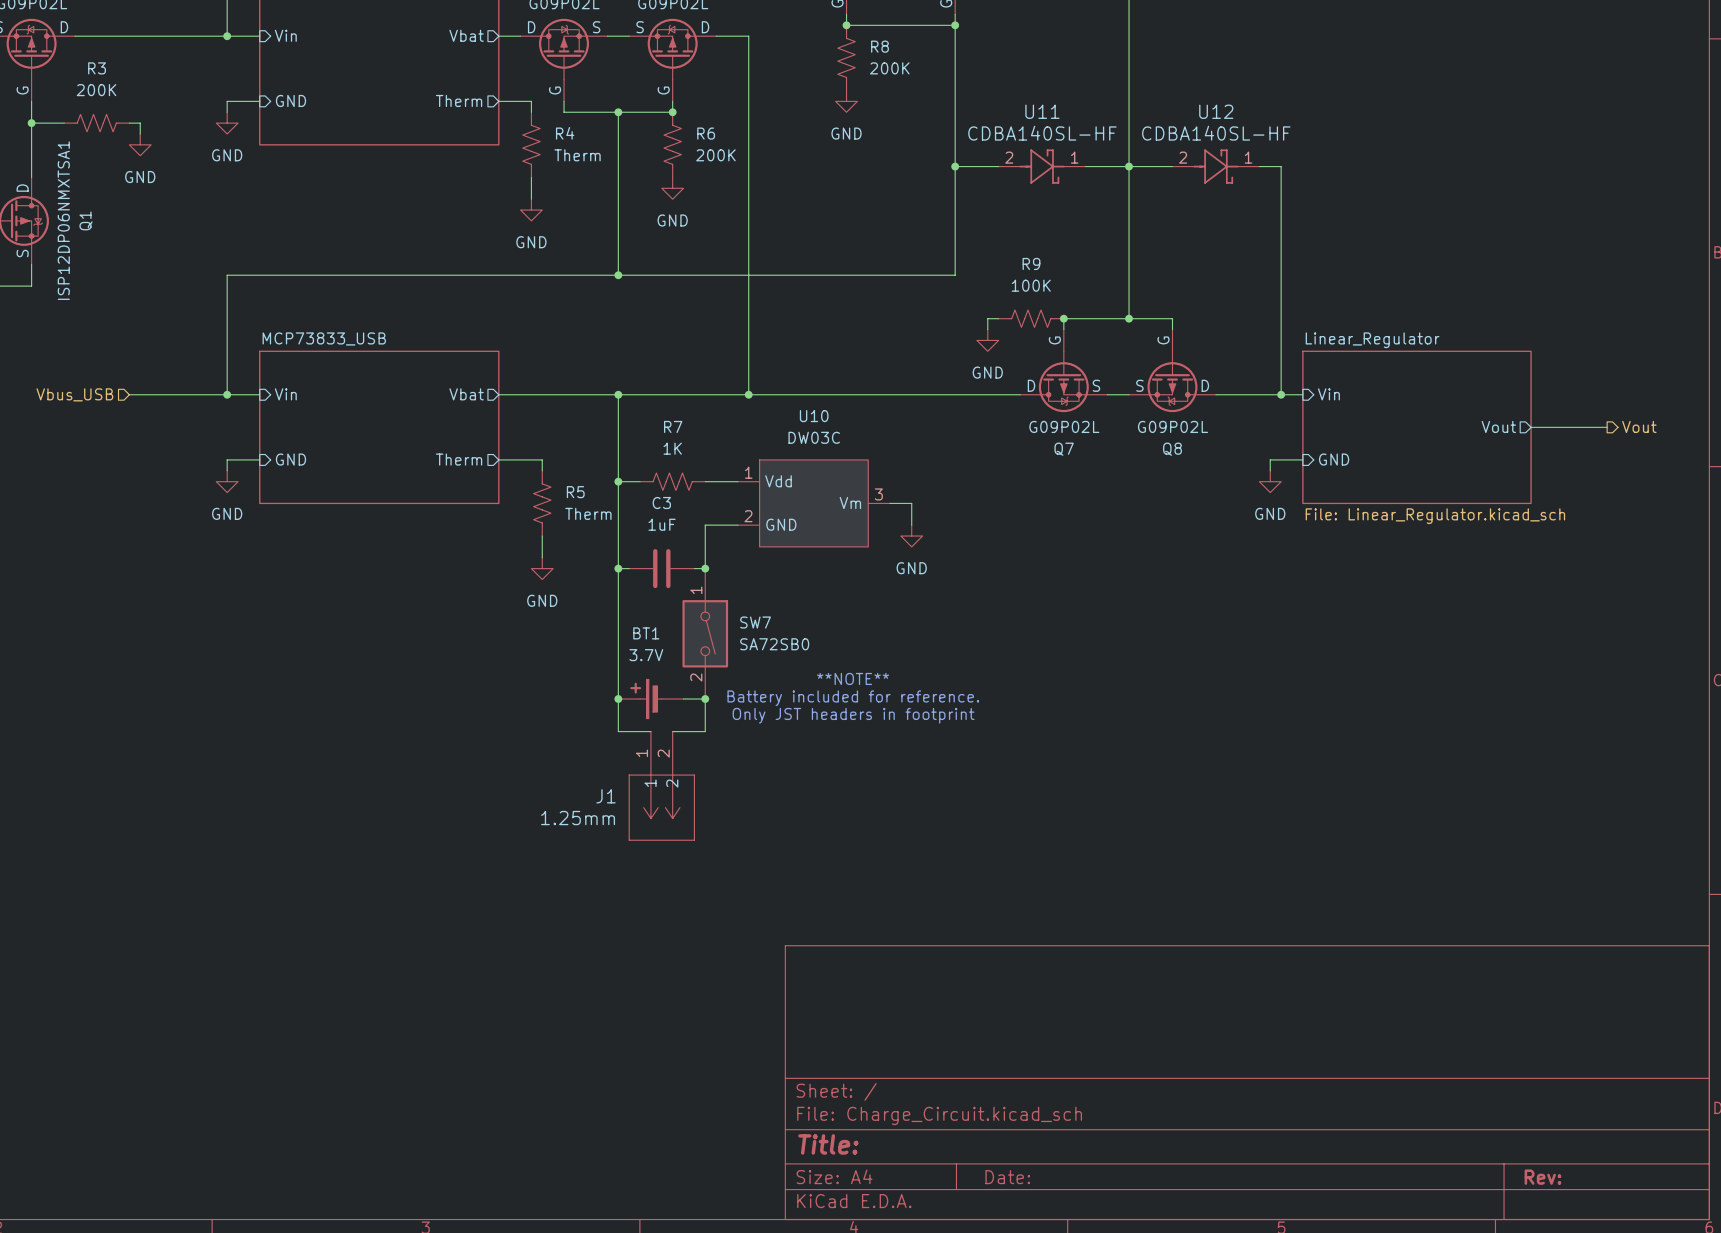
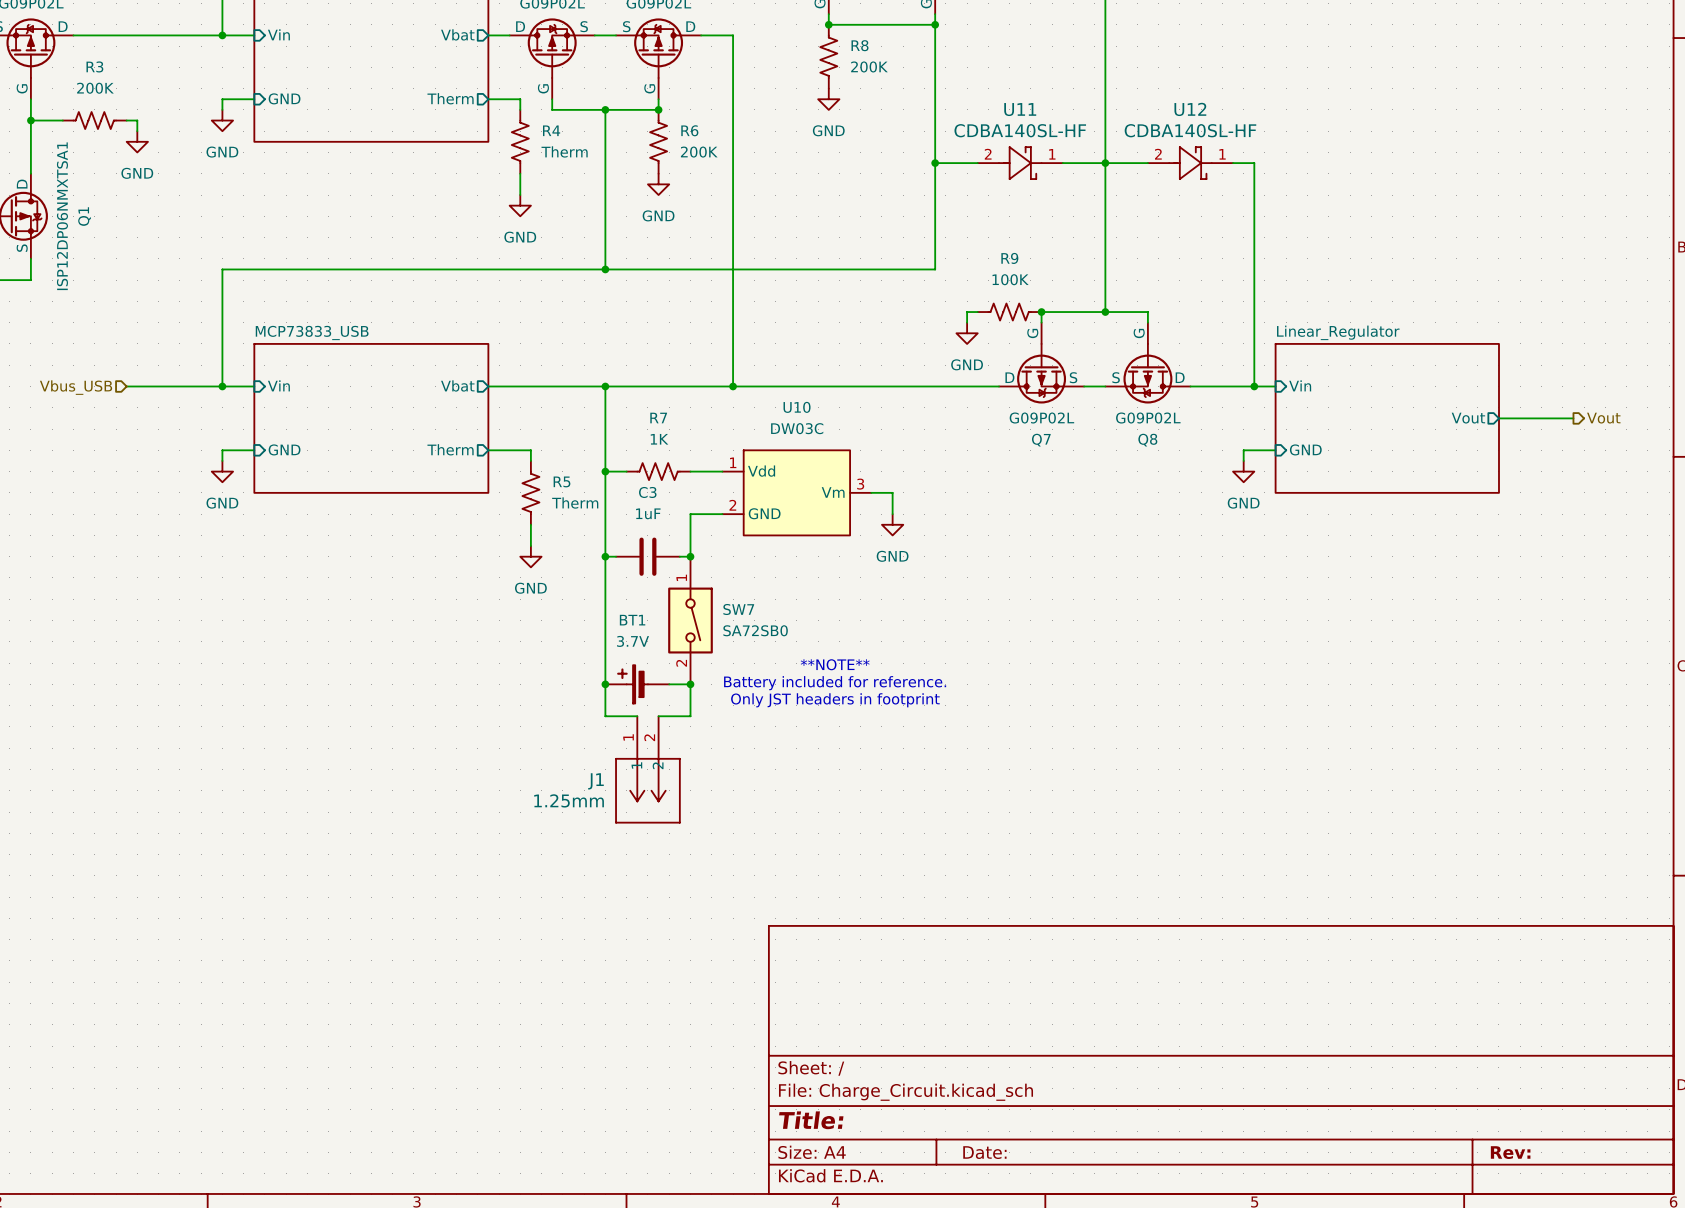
sheet Linear_Regulator value: File: Linear_Regulator.kicad_sch (1435, 516) -> none

